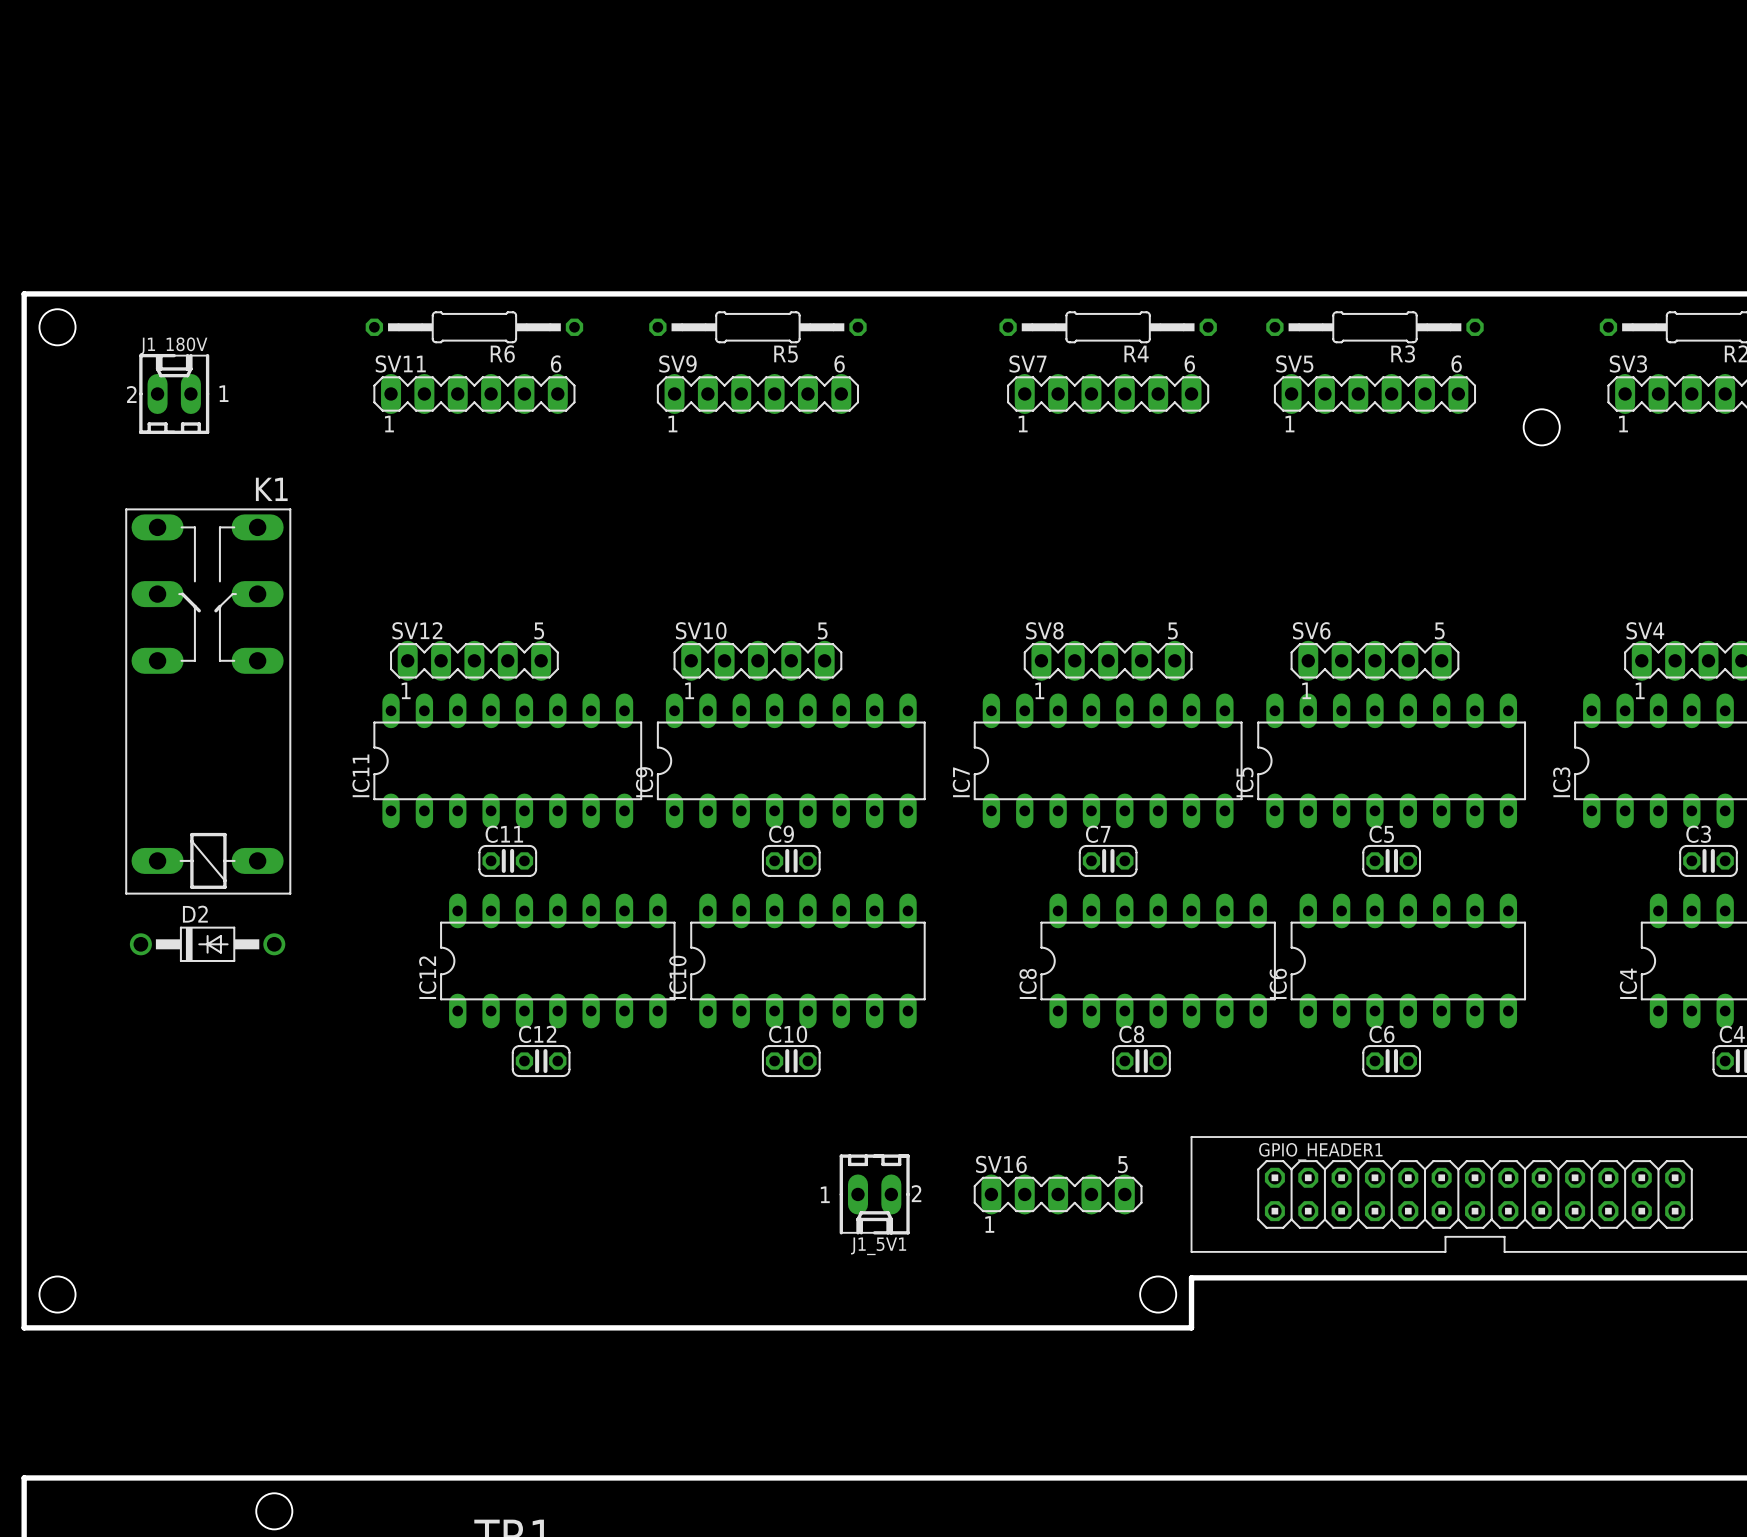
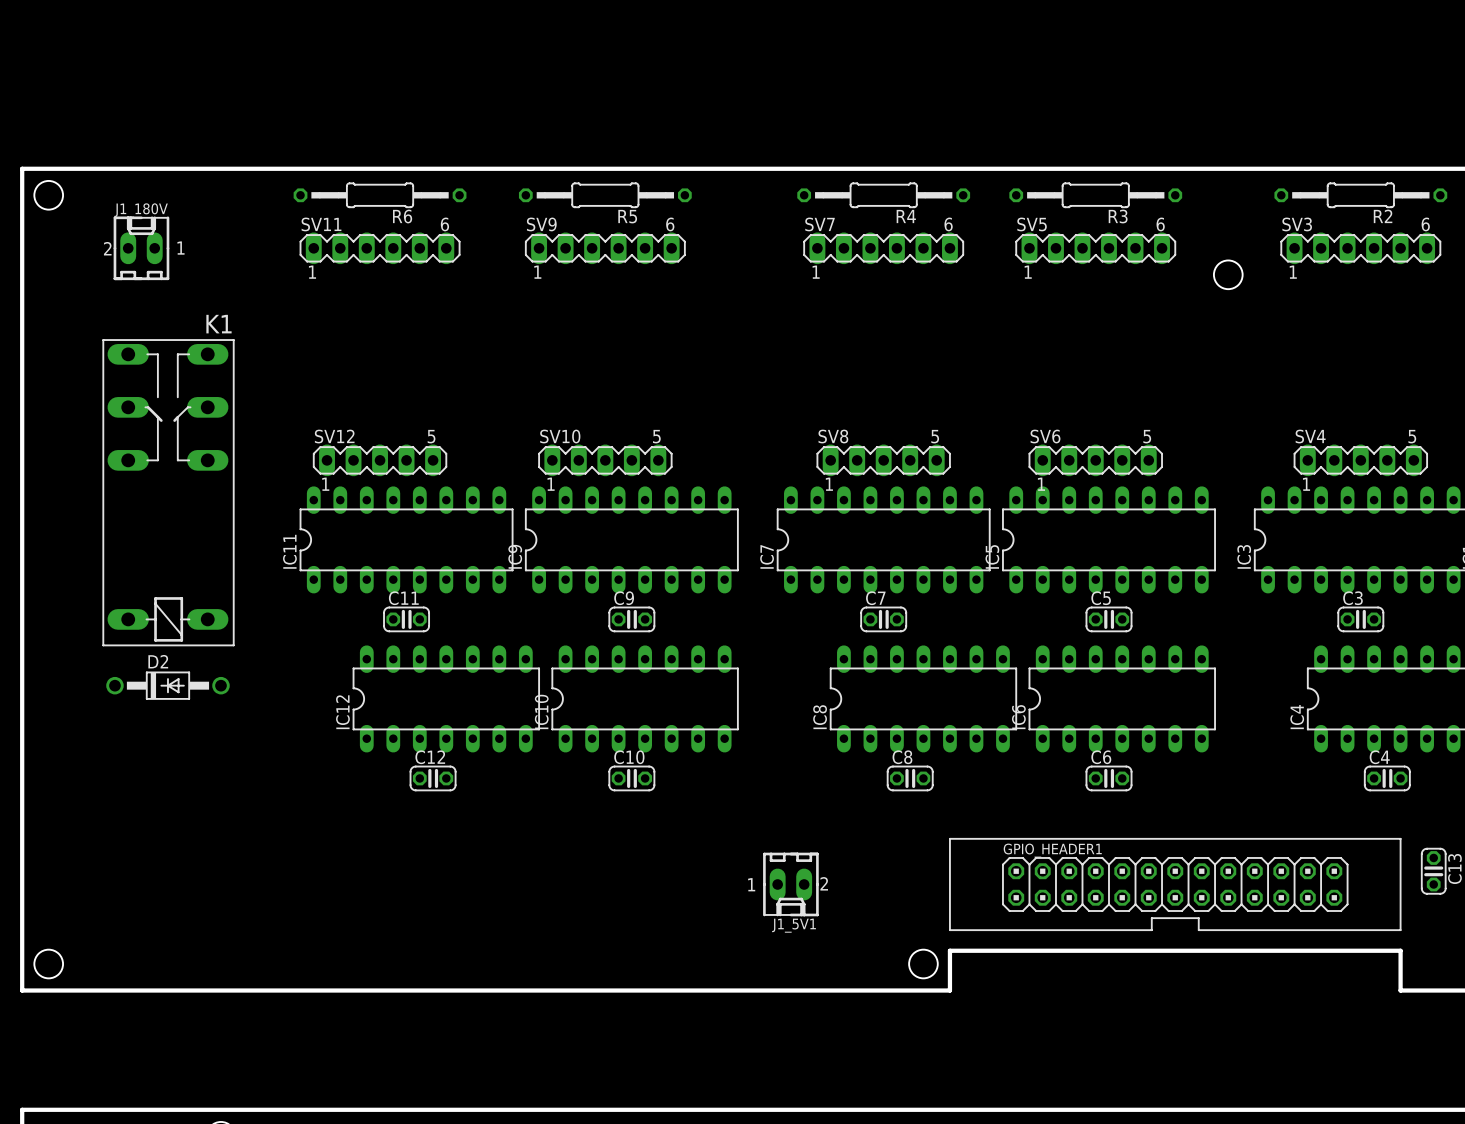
J1_5V1 position: (874, 1194) -> (790, 884)
SV16: (1058, 1194) -> none

